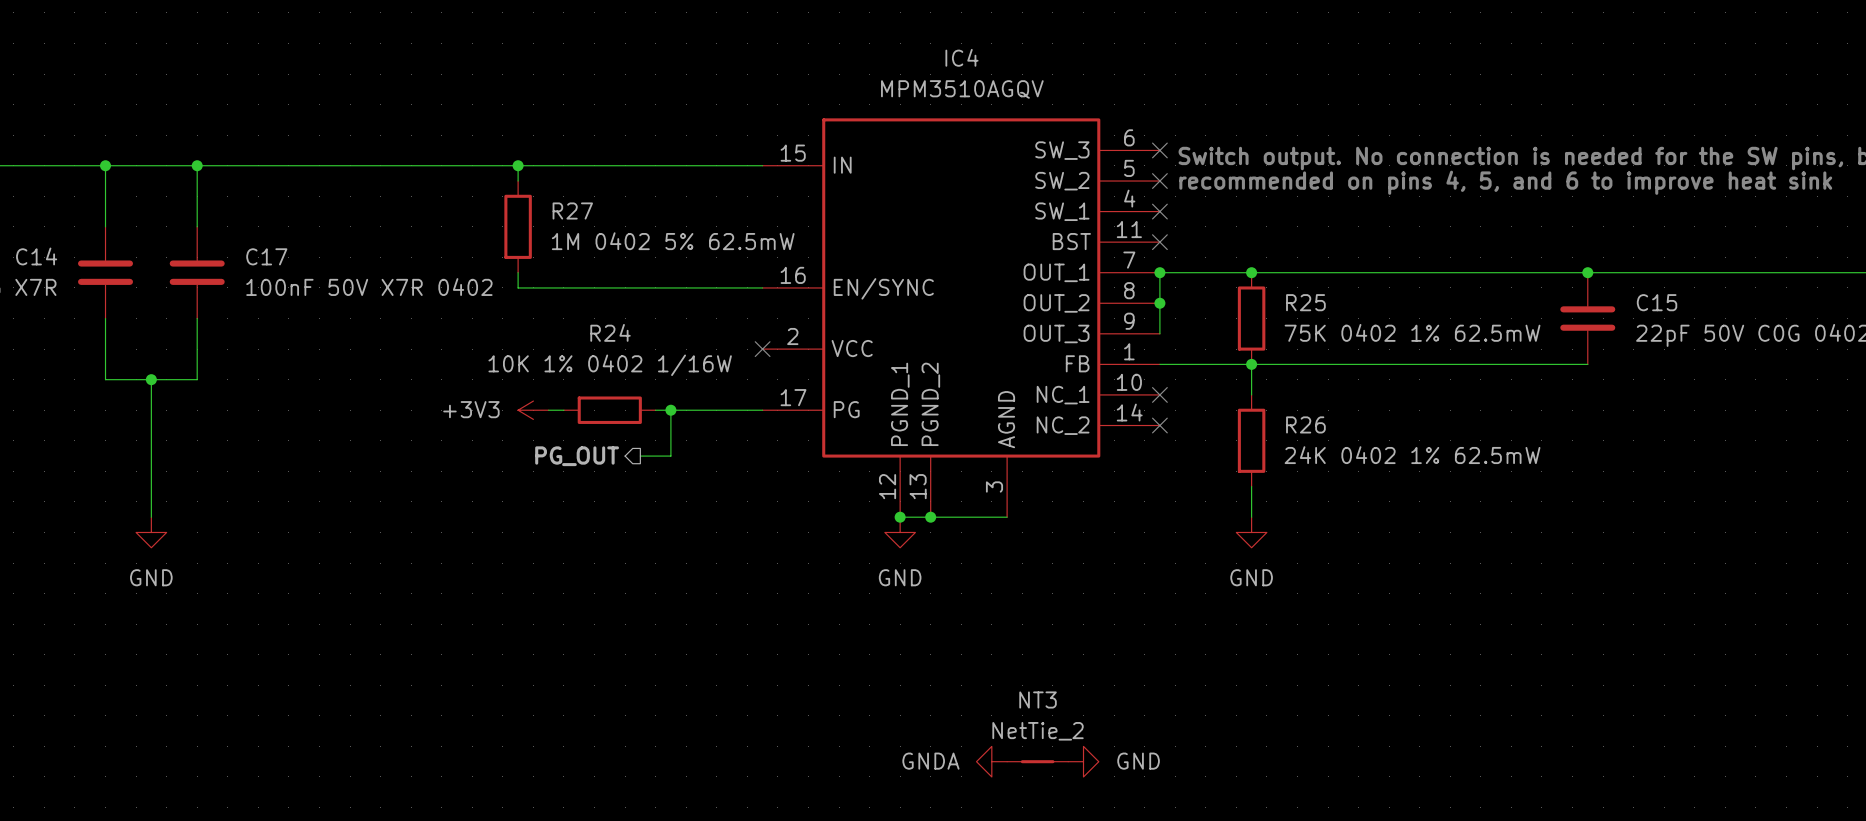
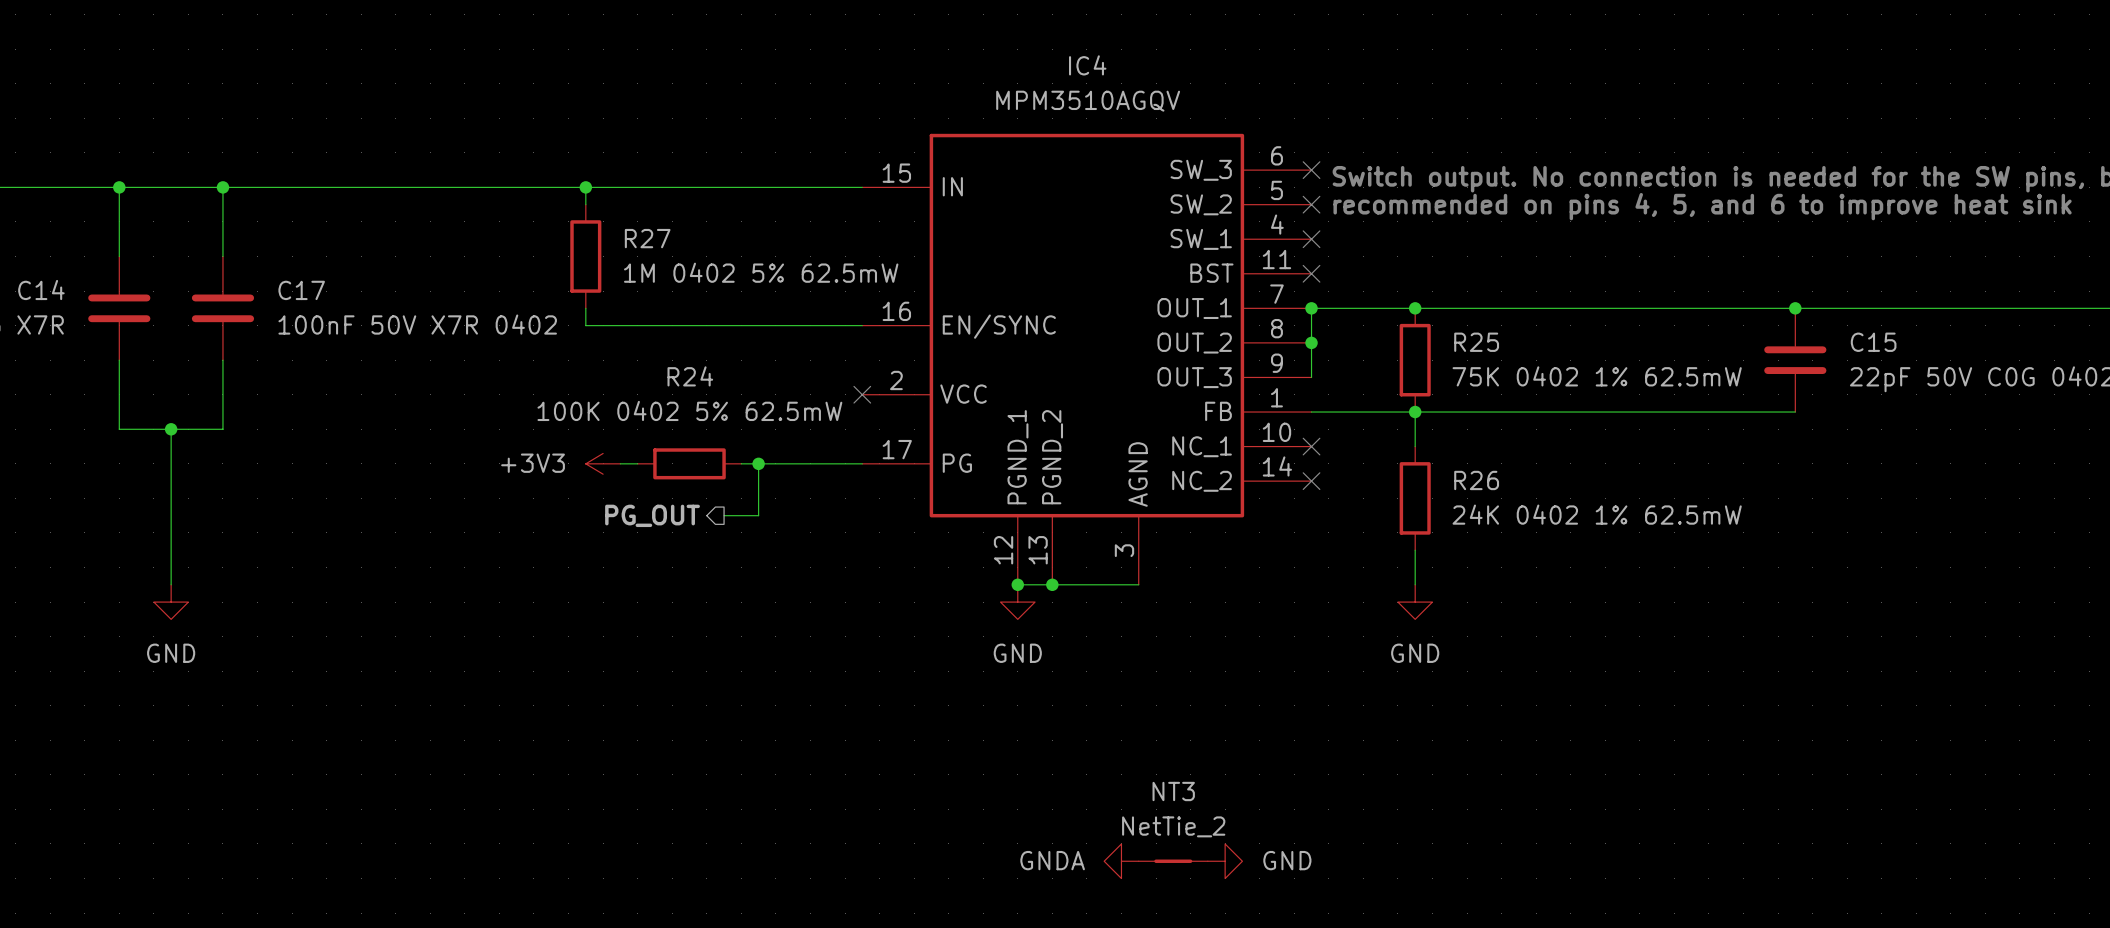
R24 value: 10K 1% 0402 1/16W (610, 365) -> 100K 0402 5% 62.5mW (689, 410)

